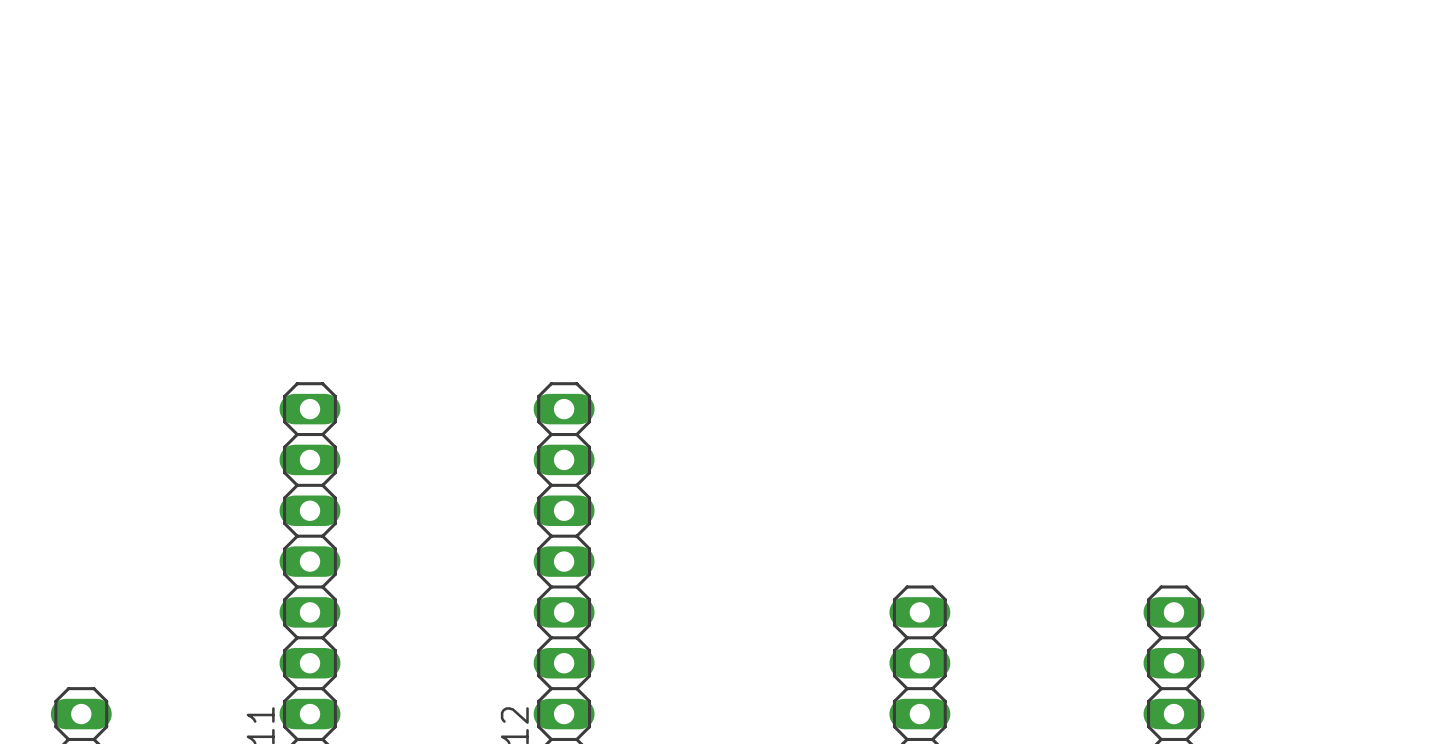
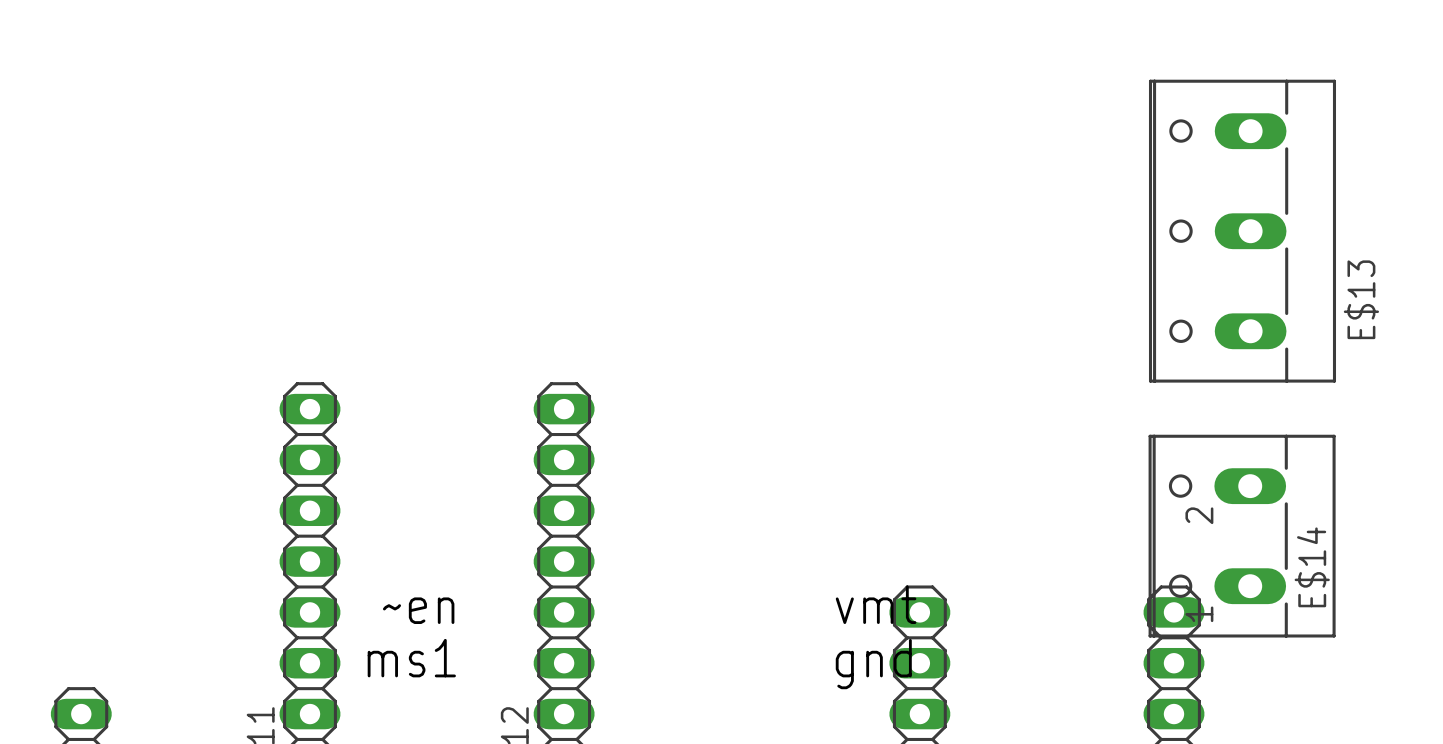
E$13: none -> (1242, 231)
E$14: none -> (1242, 536)
text: none -> vmt (876, 604)
text: none -> ~en (418, 610)
text: none -> ms1 (411, 658)
text: none -> gnd (873, 664)

